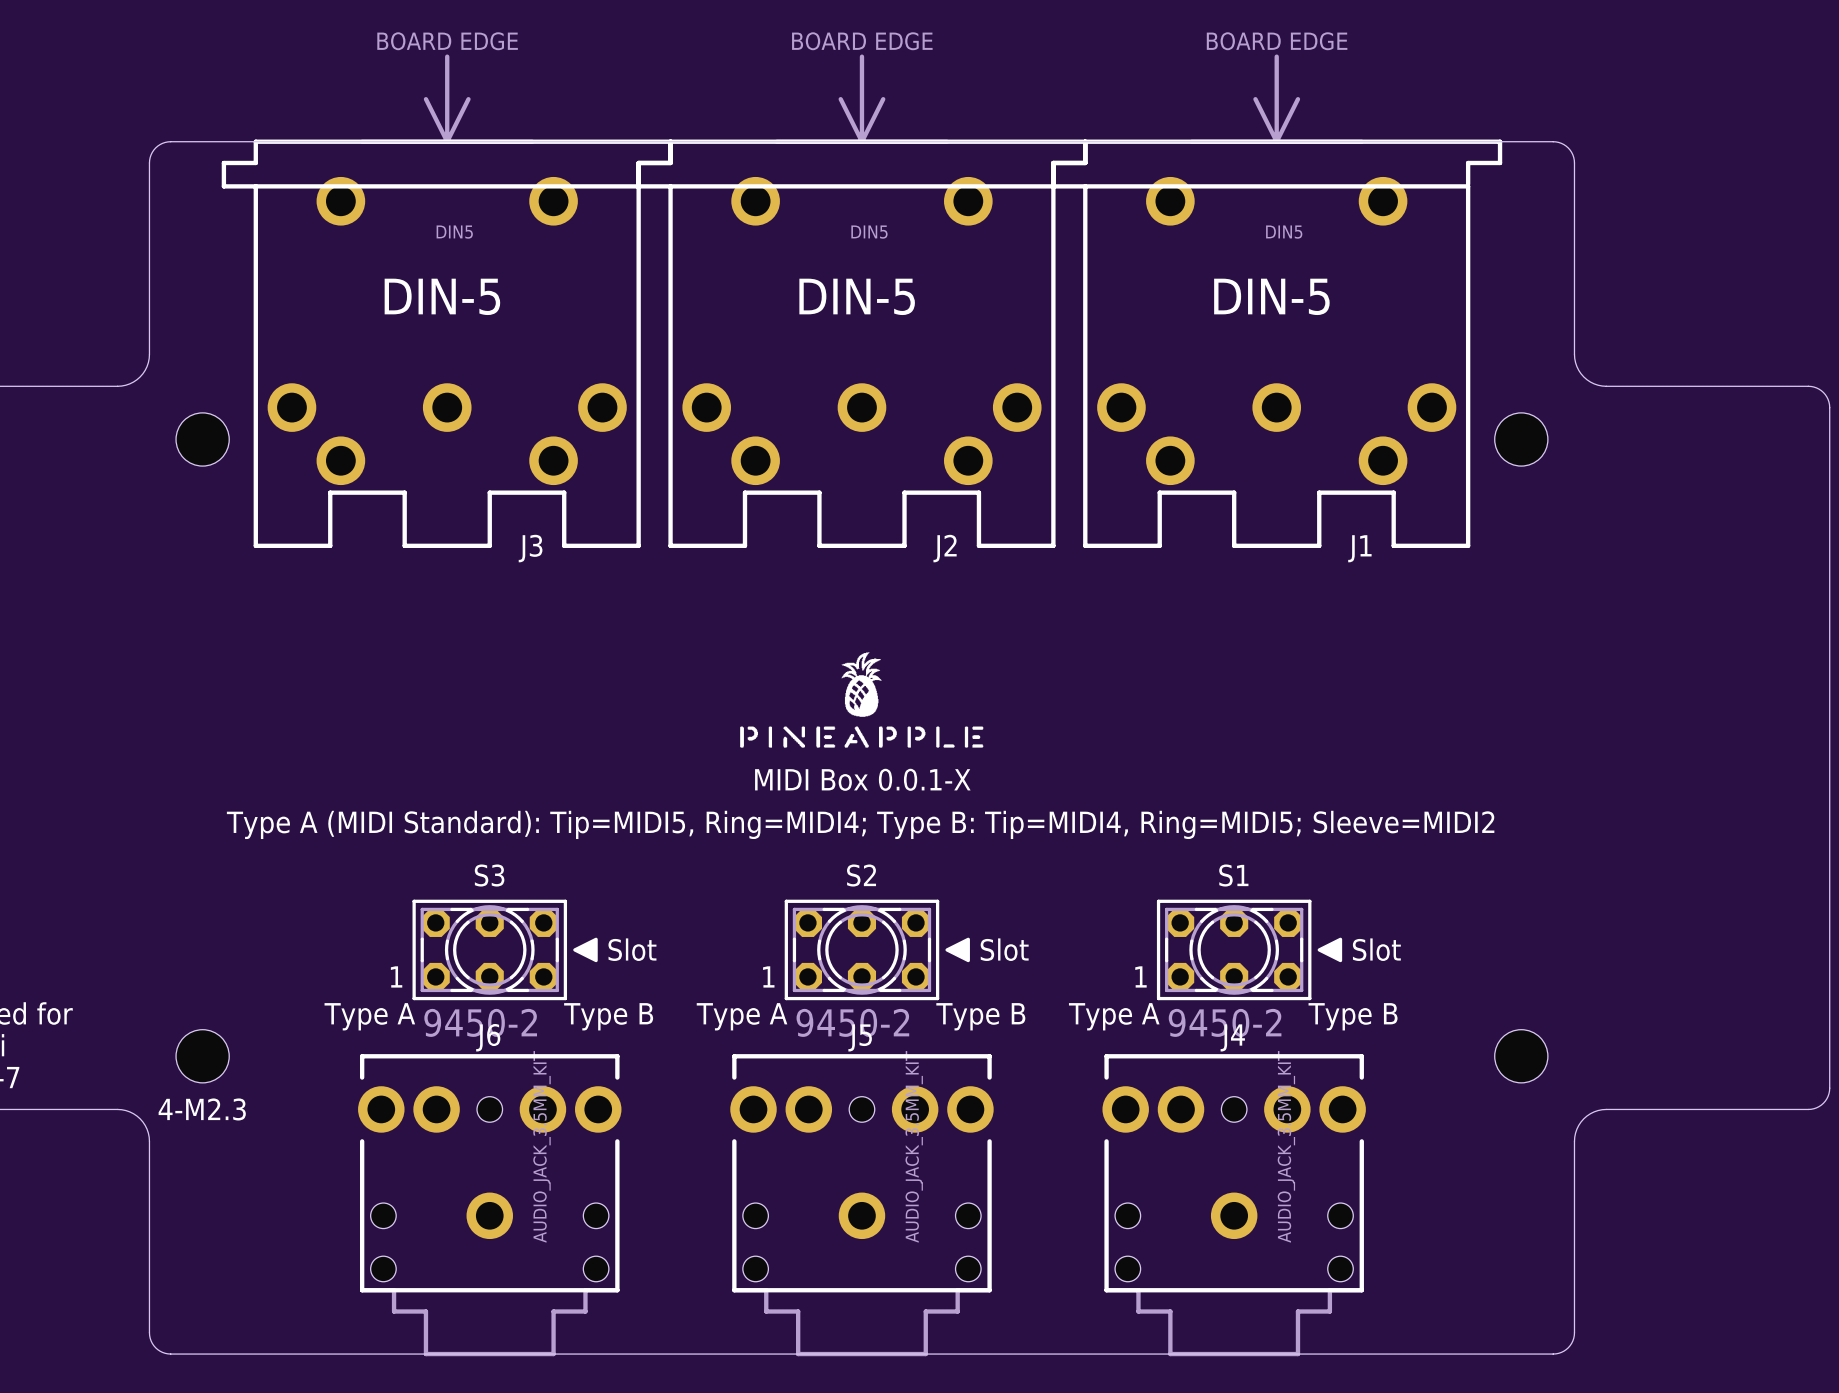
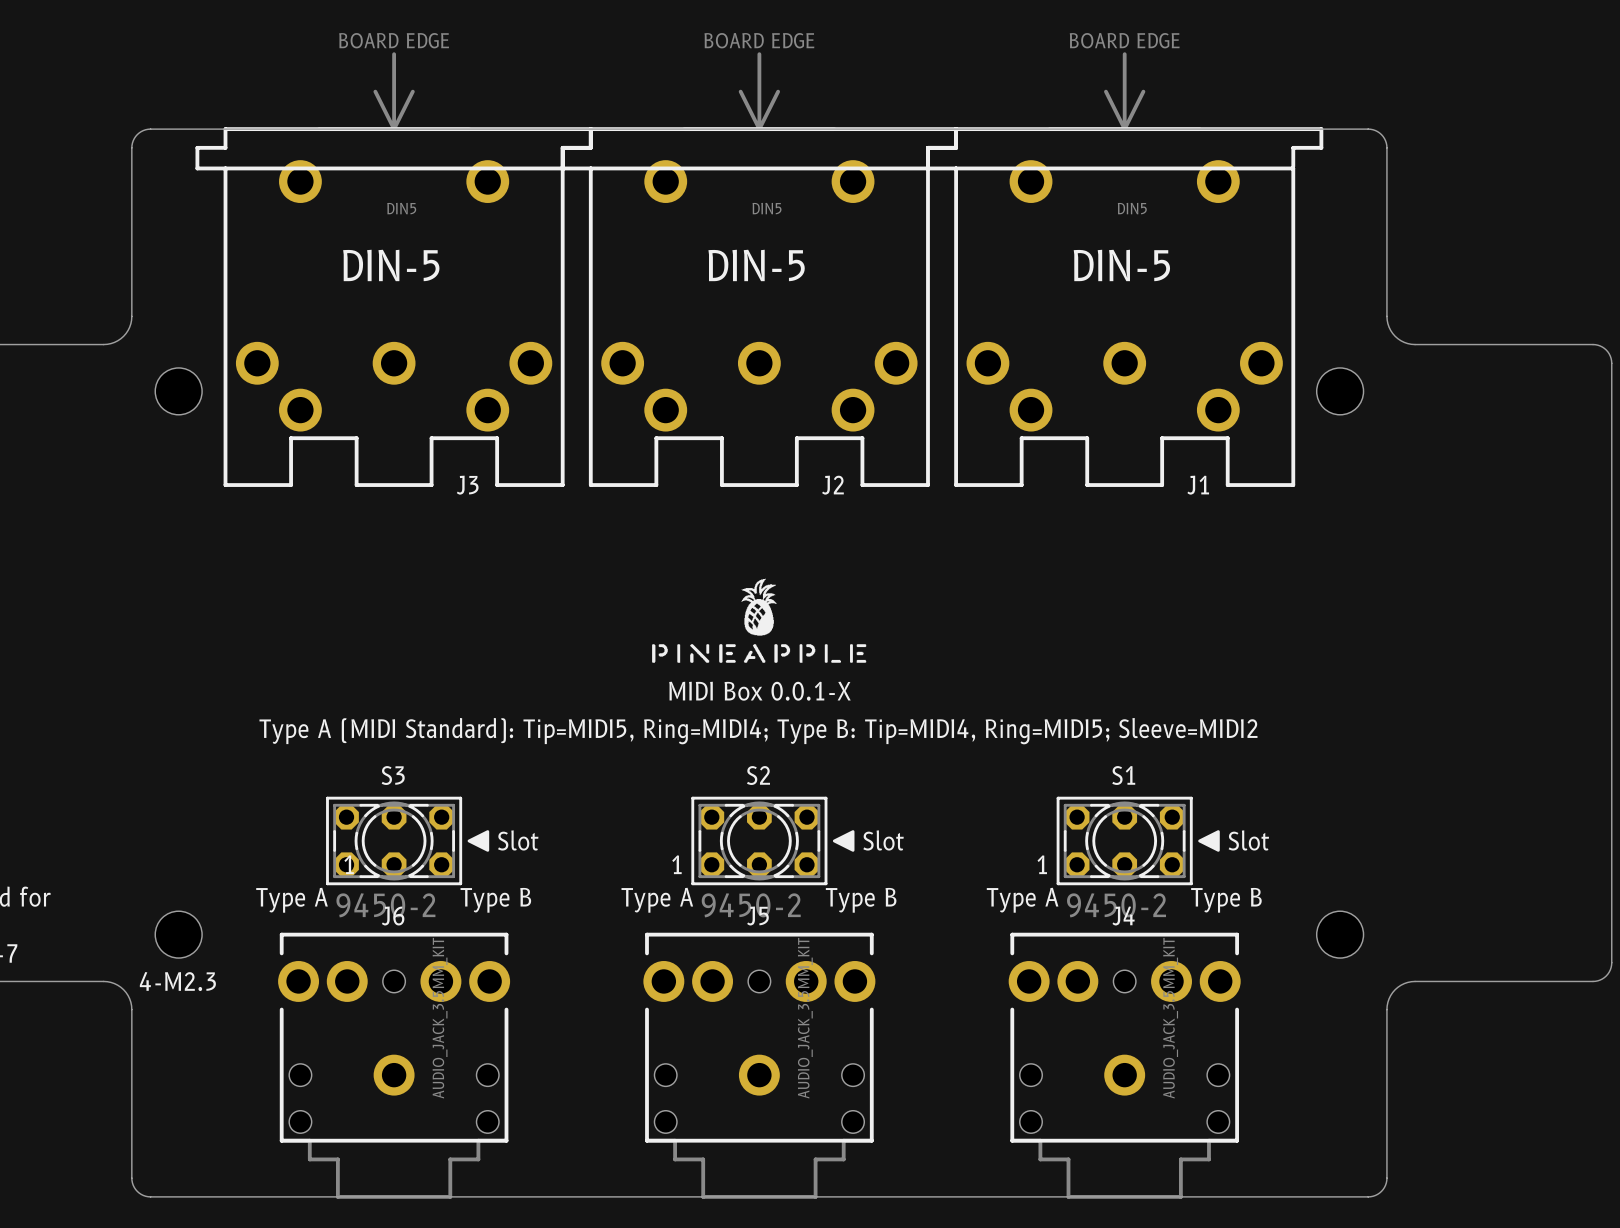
S3 position: (489, 949) -> (394, 840)
drawing position: (585, 949) -> (478, 840)
text position: Slot (632, 949) -> Slot (518, 840)
S1 position: (1234, 949) -> (1124, 840)
drawing position: (1329, 949) -> (1208, 840)
text position: Slot (1376, 949) -> Slot (1248, 840)
text position: 1 (1140, 976) -> 1 (1042, 864)
text position: Type A (369, 1016) -> Type A (292, 900)
text position: Type B (608, 1016) -> Type B (495, 900)
text position: Type A (1114, 1016) -> Type A (1022, 900)
text position: Type B (1353, 1016) -> Type B (1226, 900)
J6 position: (489, 1205) -> (394, 1065)
J4 position: (1234, 1205) -> (1124, 1065)

